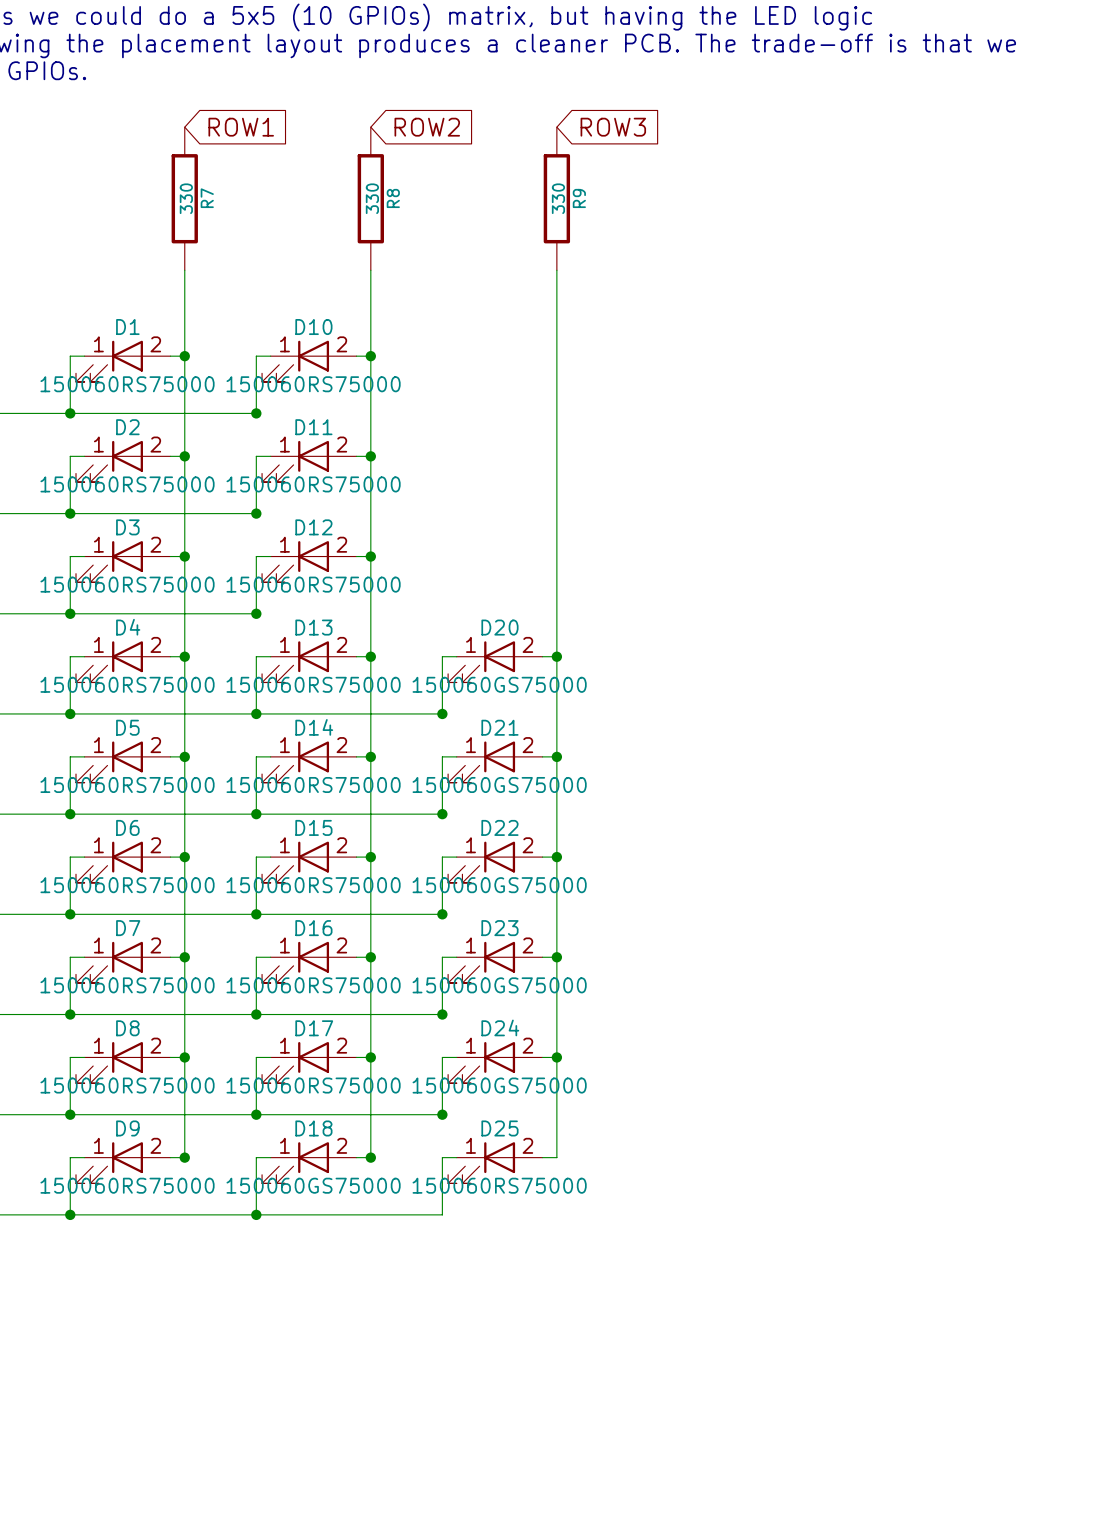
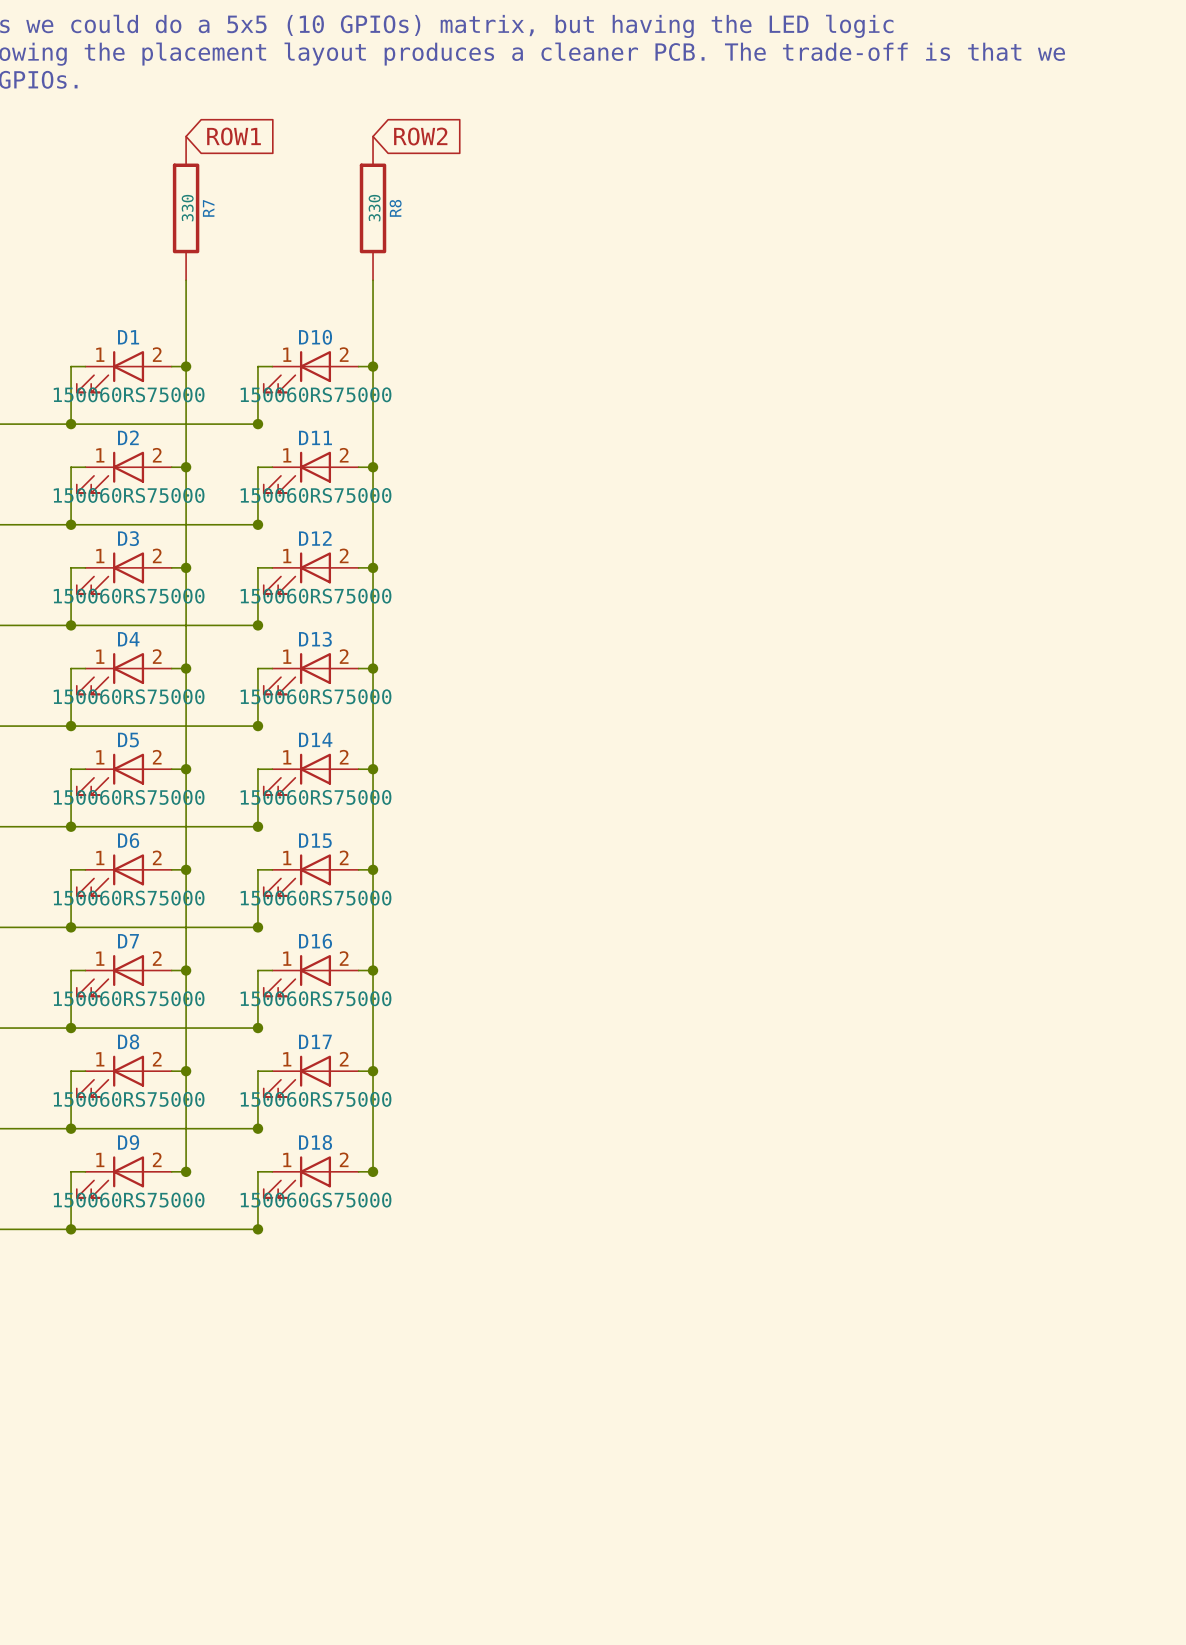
global label: ROW3 (613, 127) -> none
R9: 330 (556, 198) -> none
wire: (556, 270) (556, 1157) (542, 1157) -> none
wire: (456, 656) (442, 656) (442, 713) (256, 713) -> none
wire: (542, 656) (556, 656) -> none
junction: (556, 656) -> none
D20: 150060GS75000 (495, 661) -> none
junction: (442, 713) -> none
wire: (456, 756) (442, 756) (442, 814) (256, 814) -> none
wire: (542, 756) (556, 756) -> none
junction: (556, 756) -> none
D21: 150060GS75000 (495, 762) -> none
junction: (442, 814) -> none
wire: (456, 857) (442, 857) (442, 914) (256, 914) -> none
wire: (542, 857) (556, 857) -> none
junction: (556, 857) -> none
D22: 150060GS75000 (495, 862) -> none
junction: (442, 914) -> none
wire: (456, 957) (442, 957) (442, 1014) (256, 1014) -> none
wire: (542, 957) (556, 957) -> none
junction: (556, 957) -> none
D23: 150060GS75000 (495, 962) -> none
junction: (442, 1014) -> none
wire: (456, 1057) (442, 1057) (442, 1114) (256, 1114) -> none
wire: (542, 1057) (556, 1057) -> none
junction: (556, 1057) -> none
D24: 150060GS75000 (495, 1062) -> none
junction: (442, 1114) -> none
wire: (456, 1157) (442, 1157) (442, 1214) (256, 1214) -> none
D25: 150060RS75000 (495, 1162) -> none

